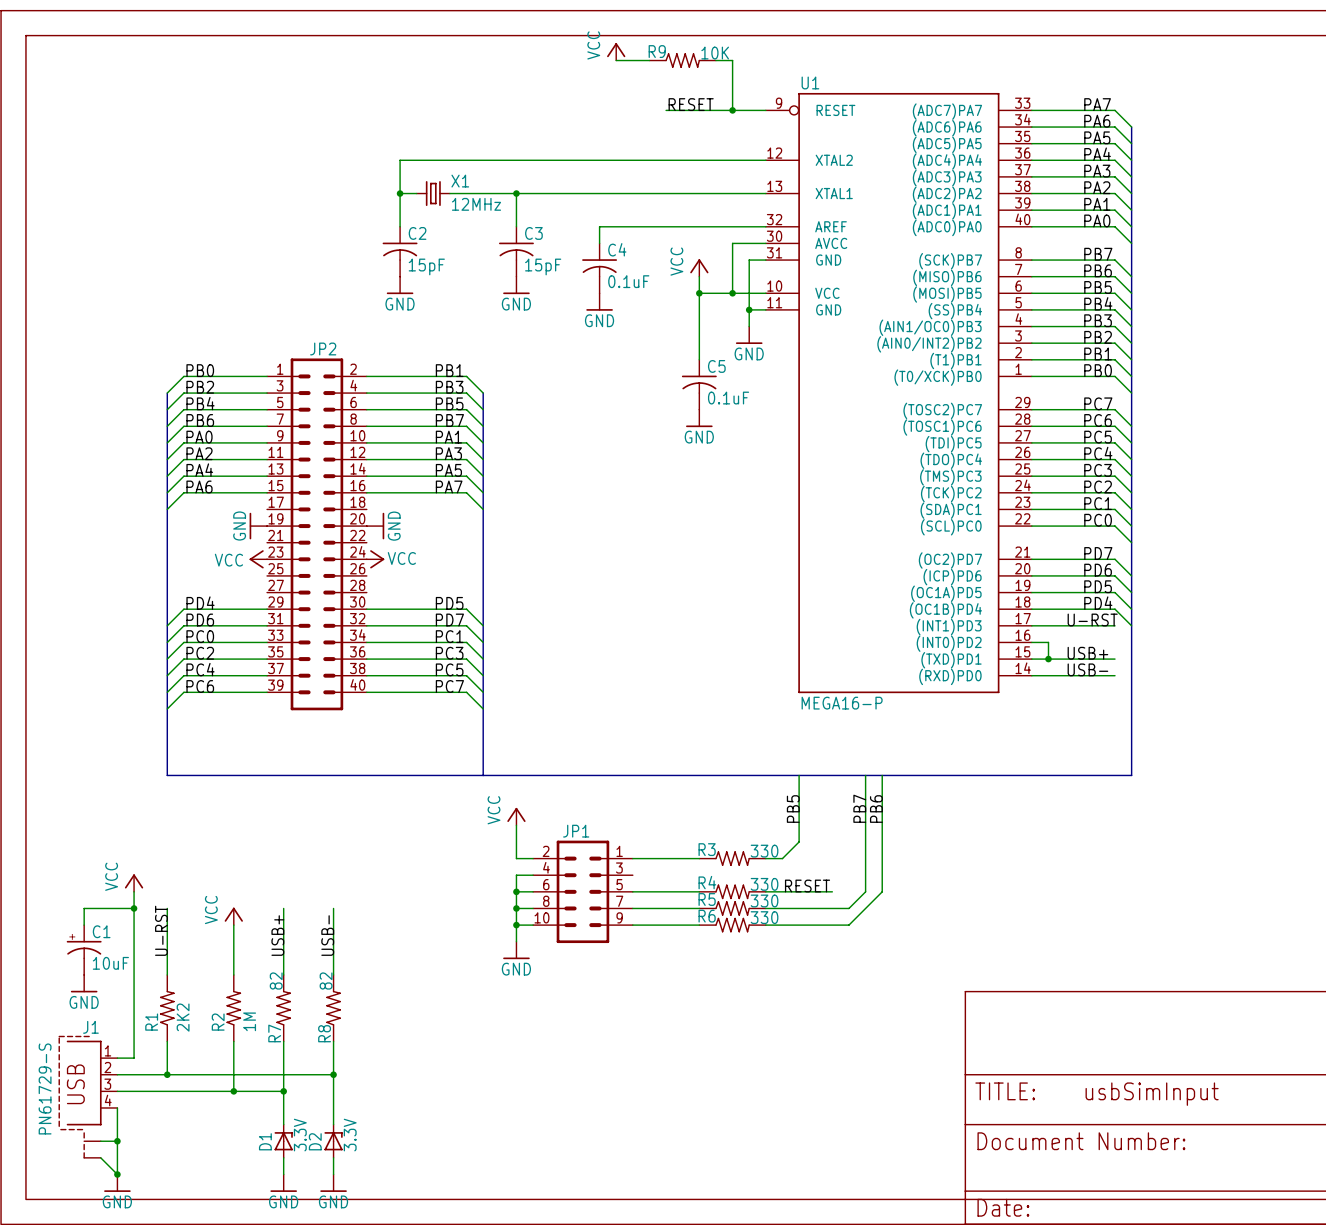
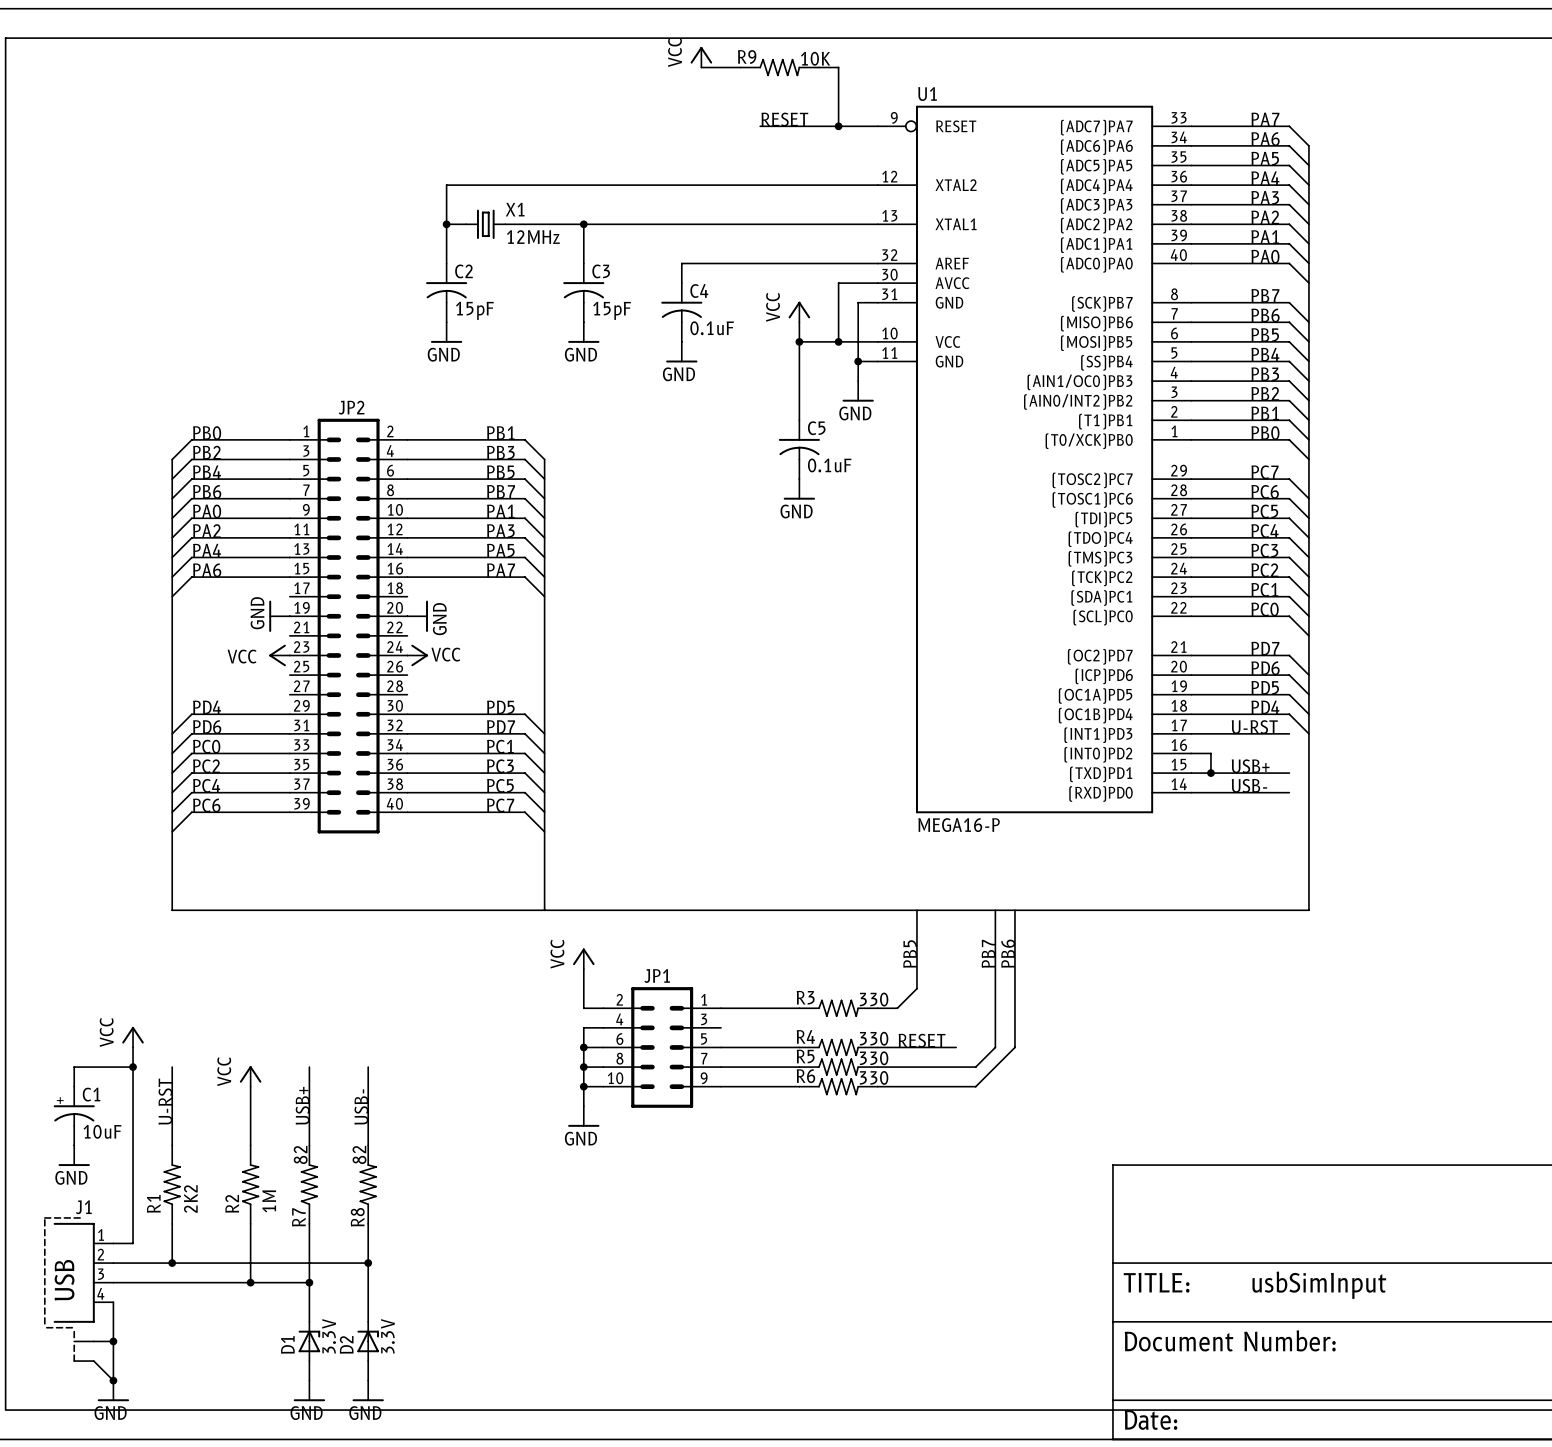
J1 value: PN61729-S (45, 1088) -> none

